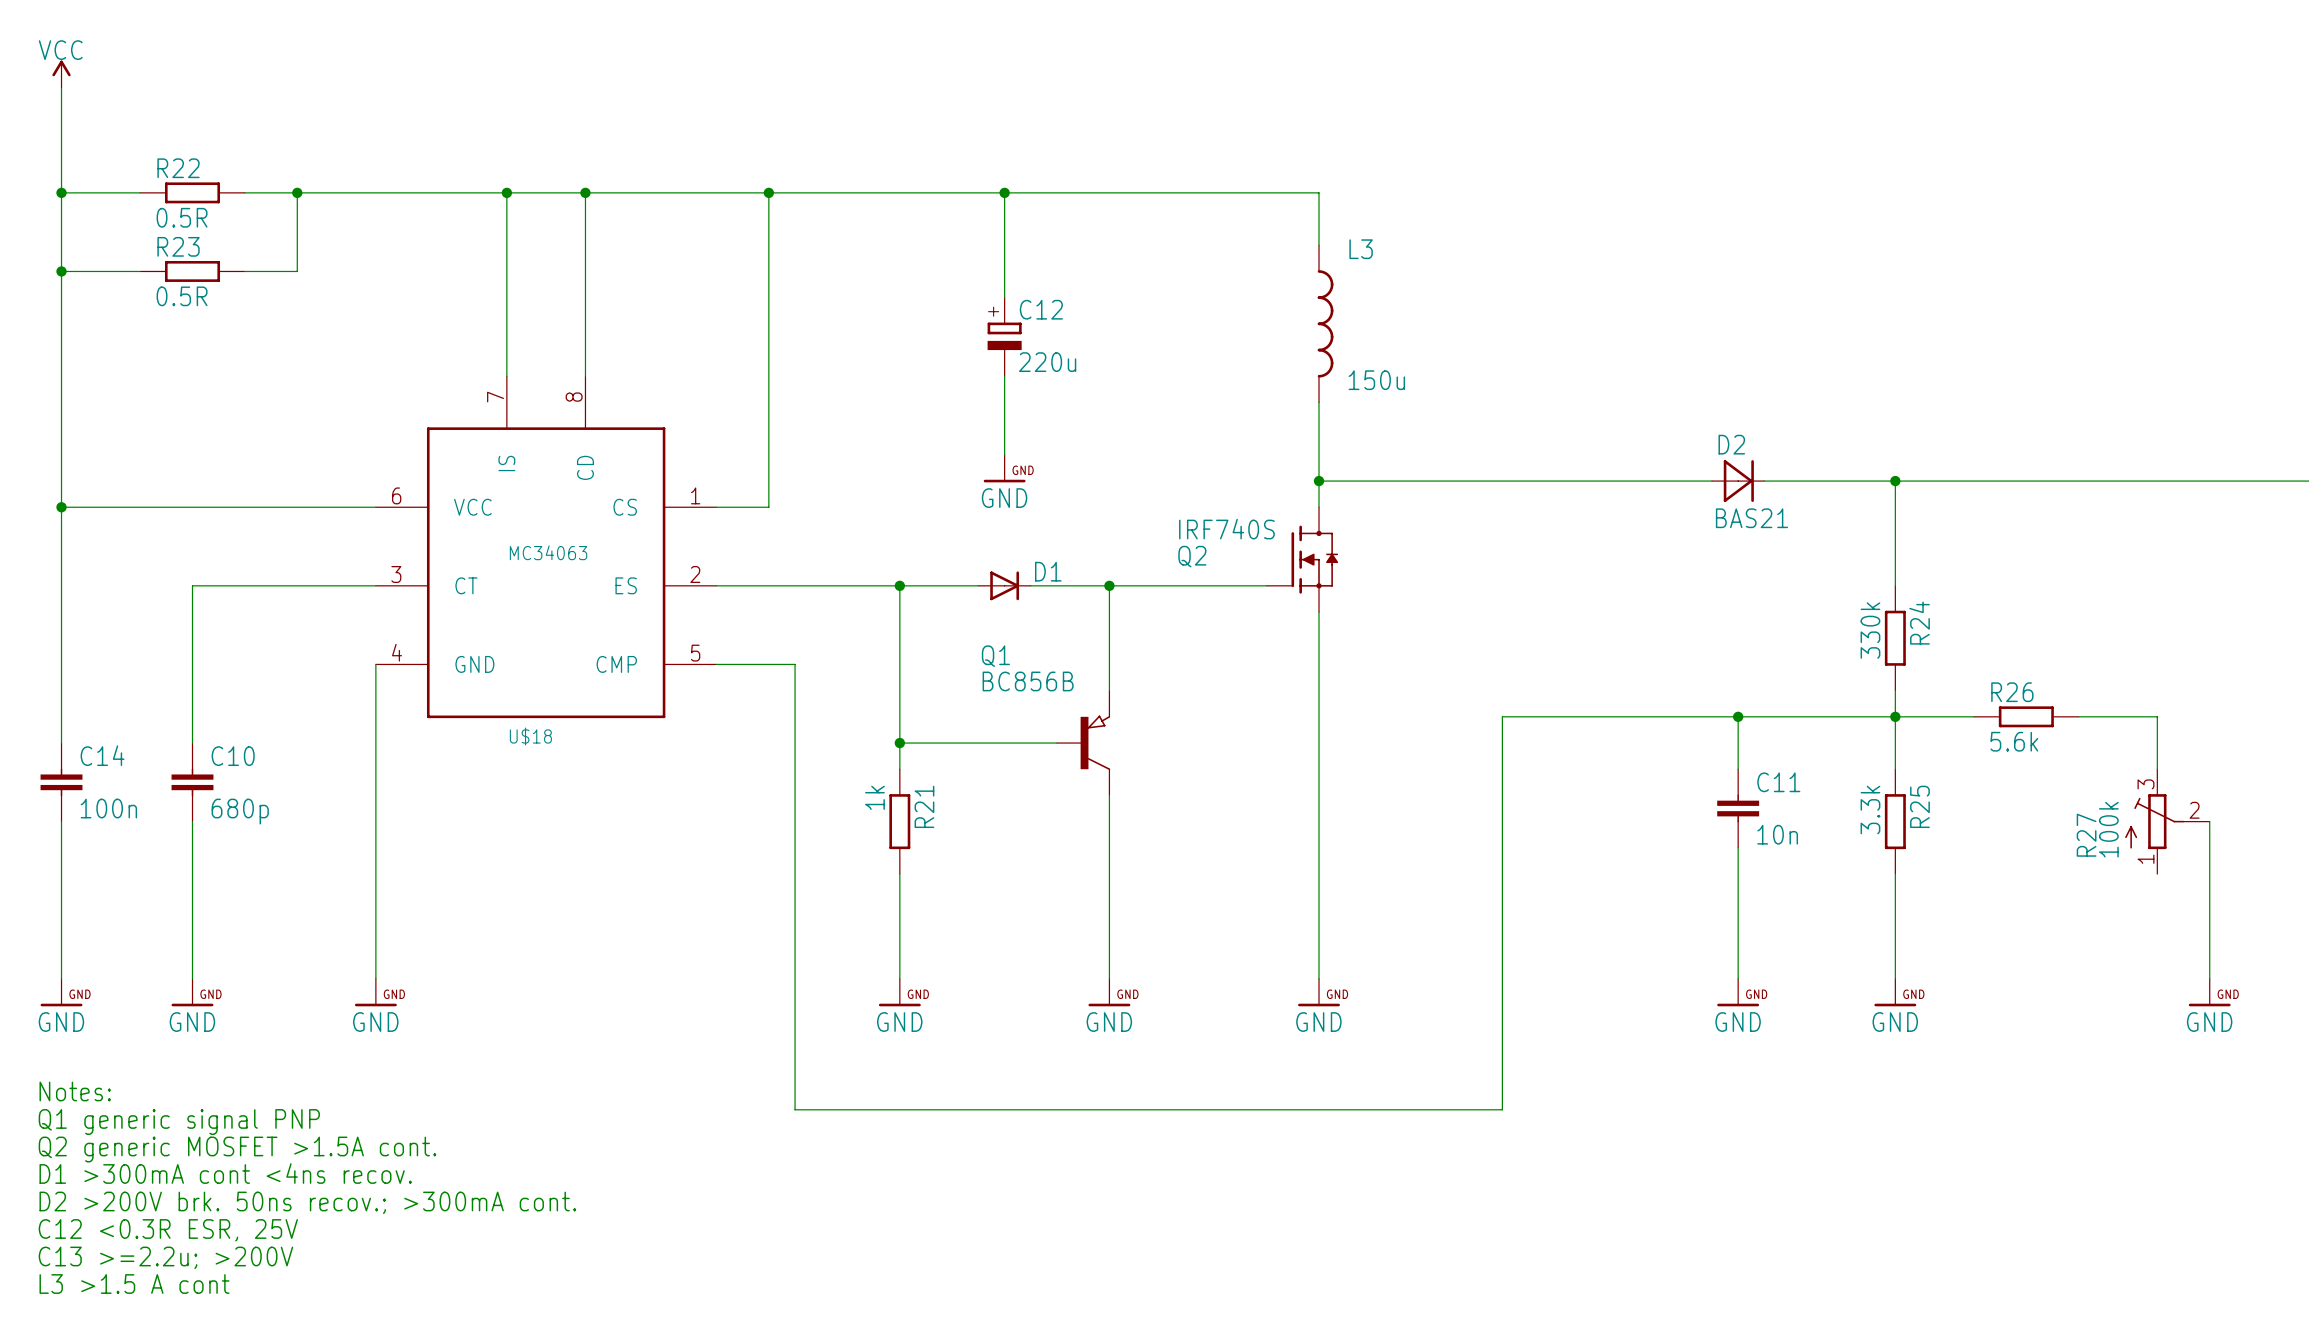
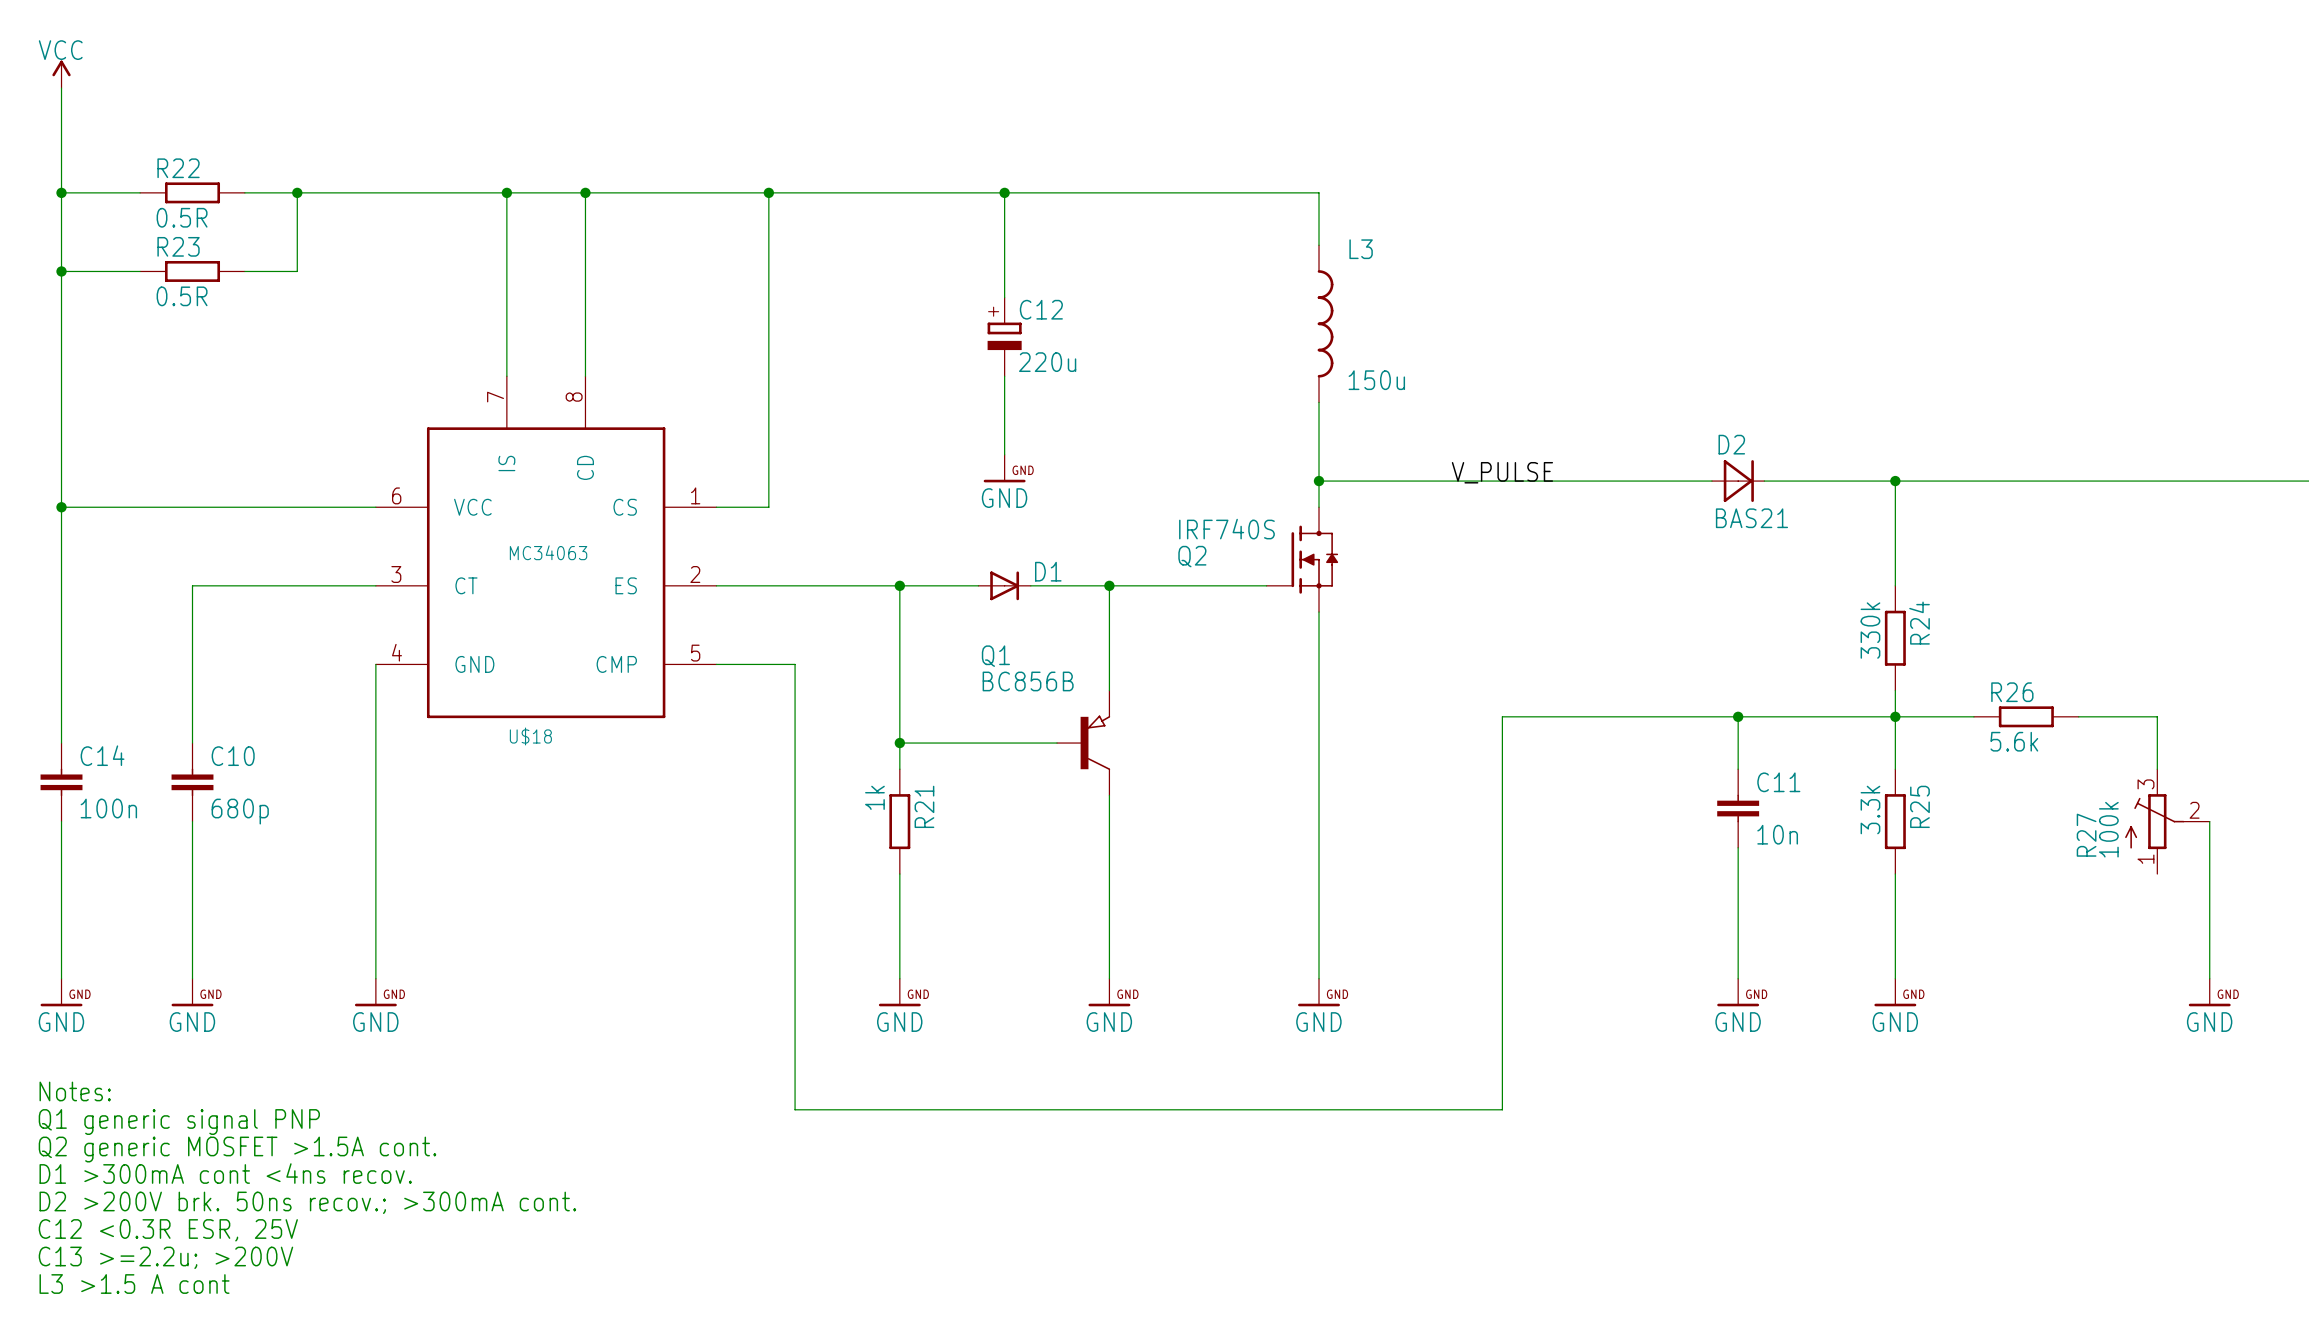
label: none -> V_PULSE (1502, 472)

